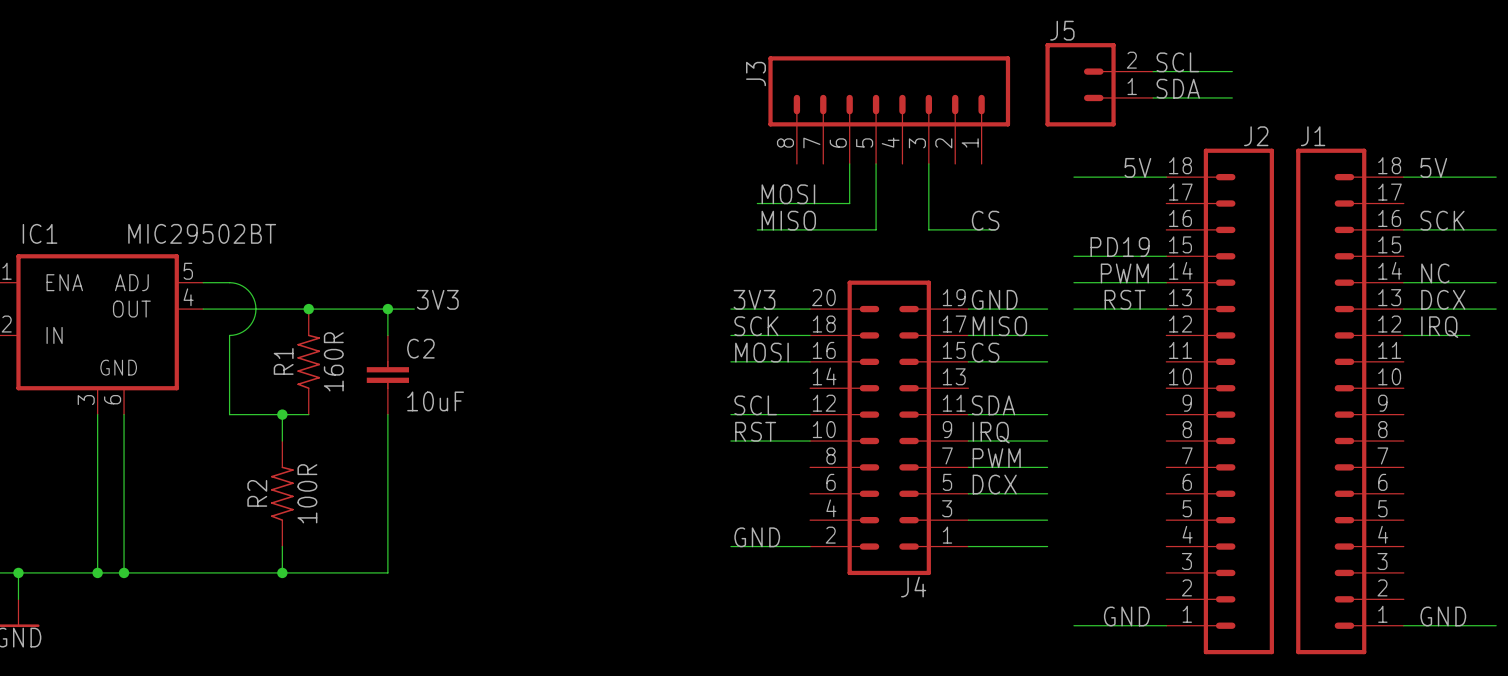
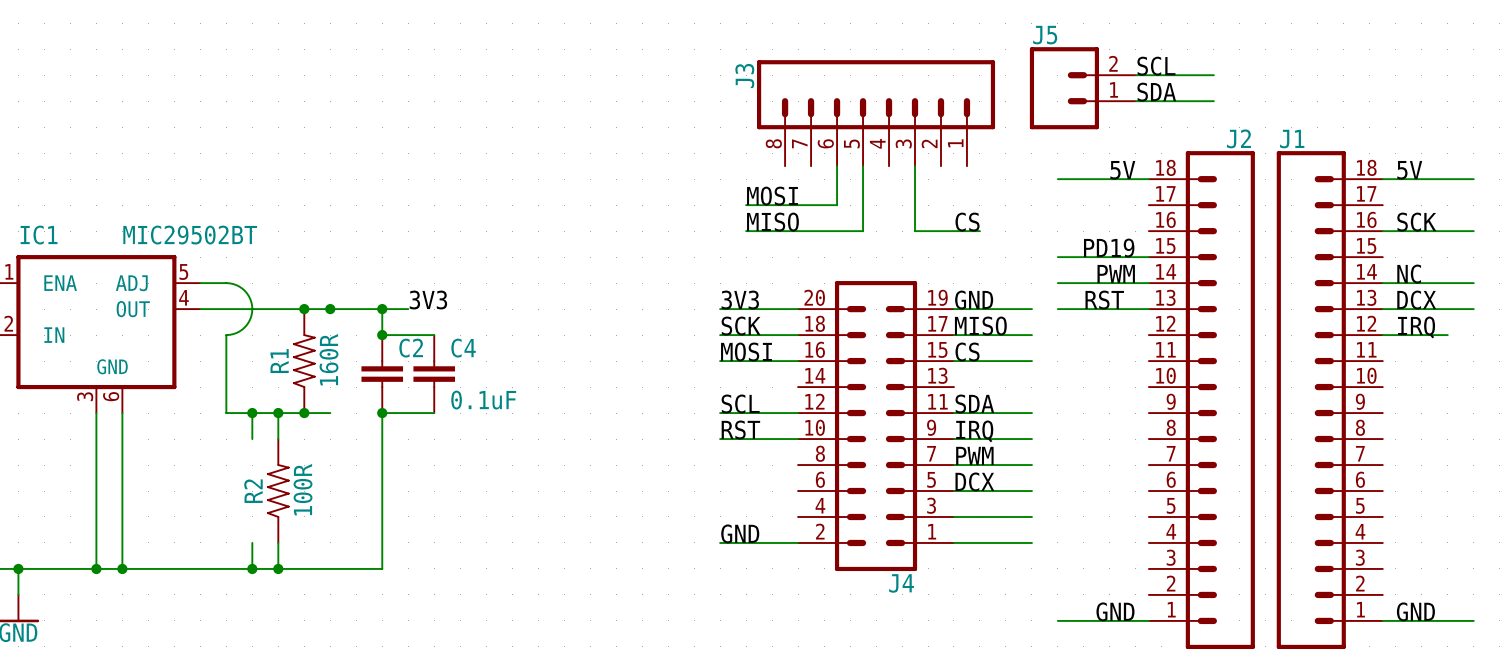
junction: none -> (330, 309)
wire: none -> (382, 335) (434, 335)
junction: none -> (382, 335)
C4: none -> 0.1uF (434, 374)
C2 value: 10uF (435, 401) -> none
wire: none -> (252, 413) (252, 439)
junction: none -> (252, 413)
wire: none -> (304, 413) (330, 413)
junction: none -> (304, 413)
wire: none -> (382, 413) (434, 413)
junction: none -> (382, 413)
wire: none -> (252, 542) (252, 568)
junction: none -> (252, 568)

